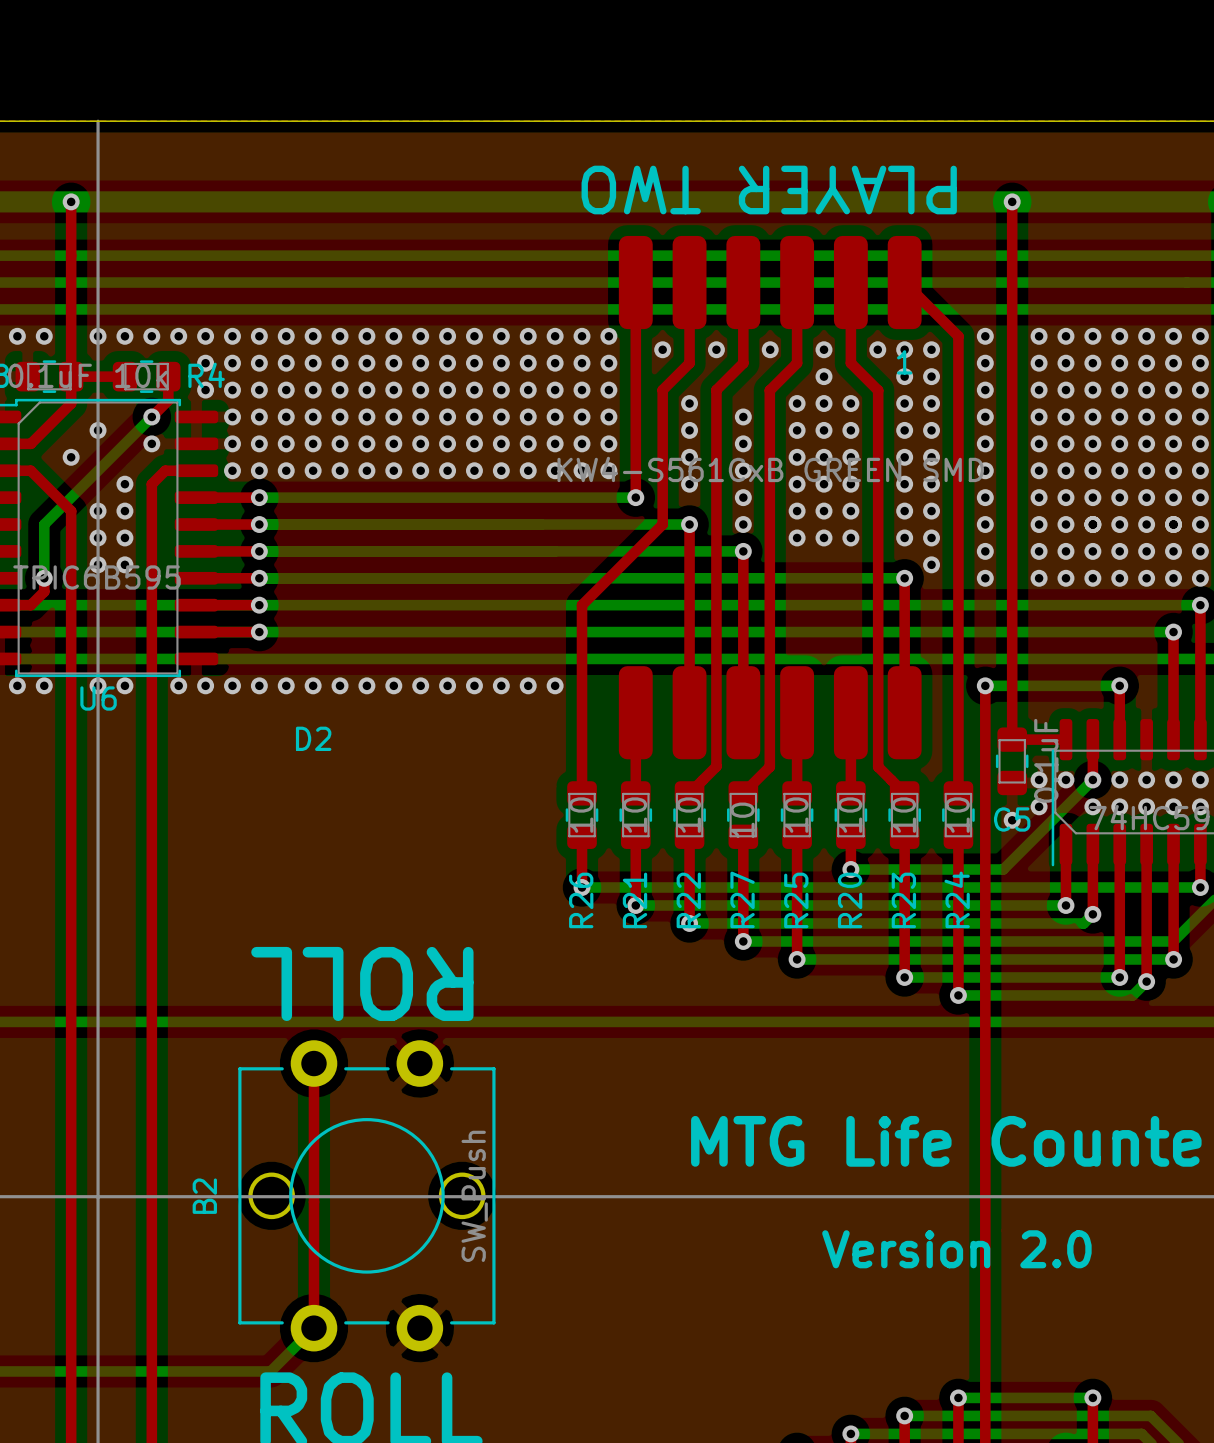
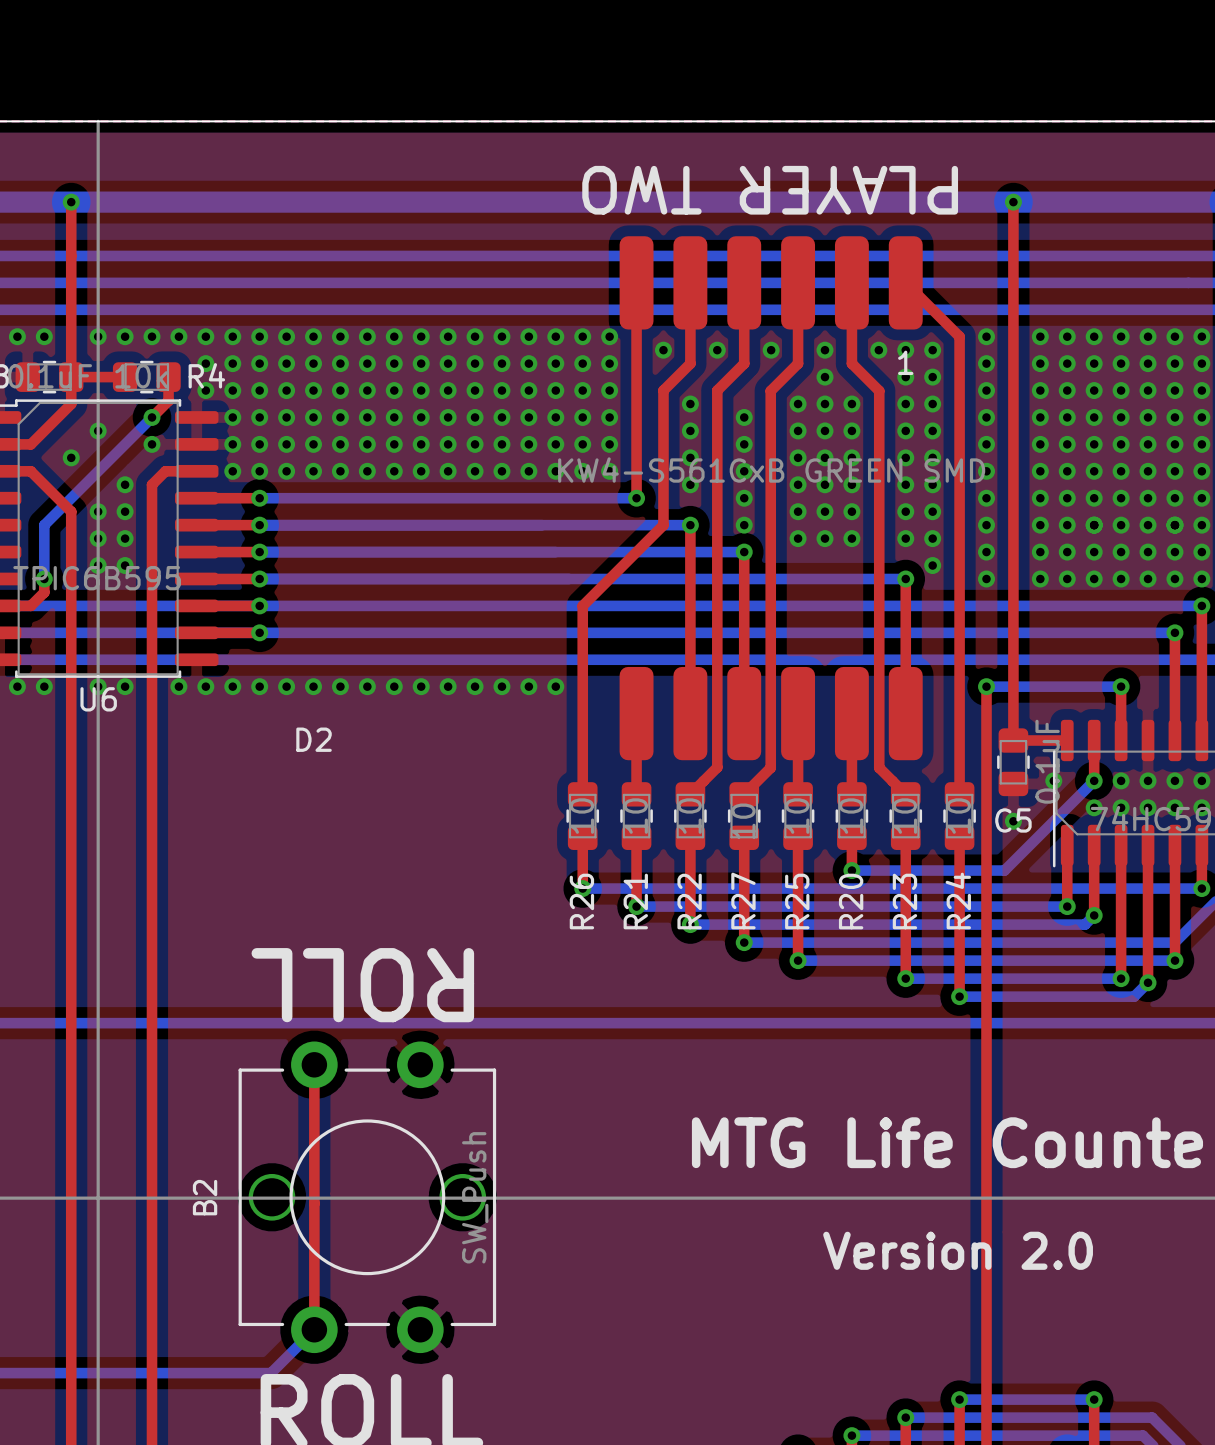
via: (1039, 779) -> none
via: none -> (1053, 780)
via: (1065, 779) -> none
via: (1039, 806) -> none

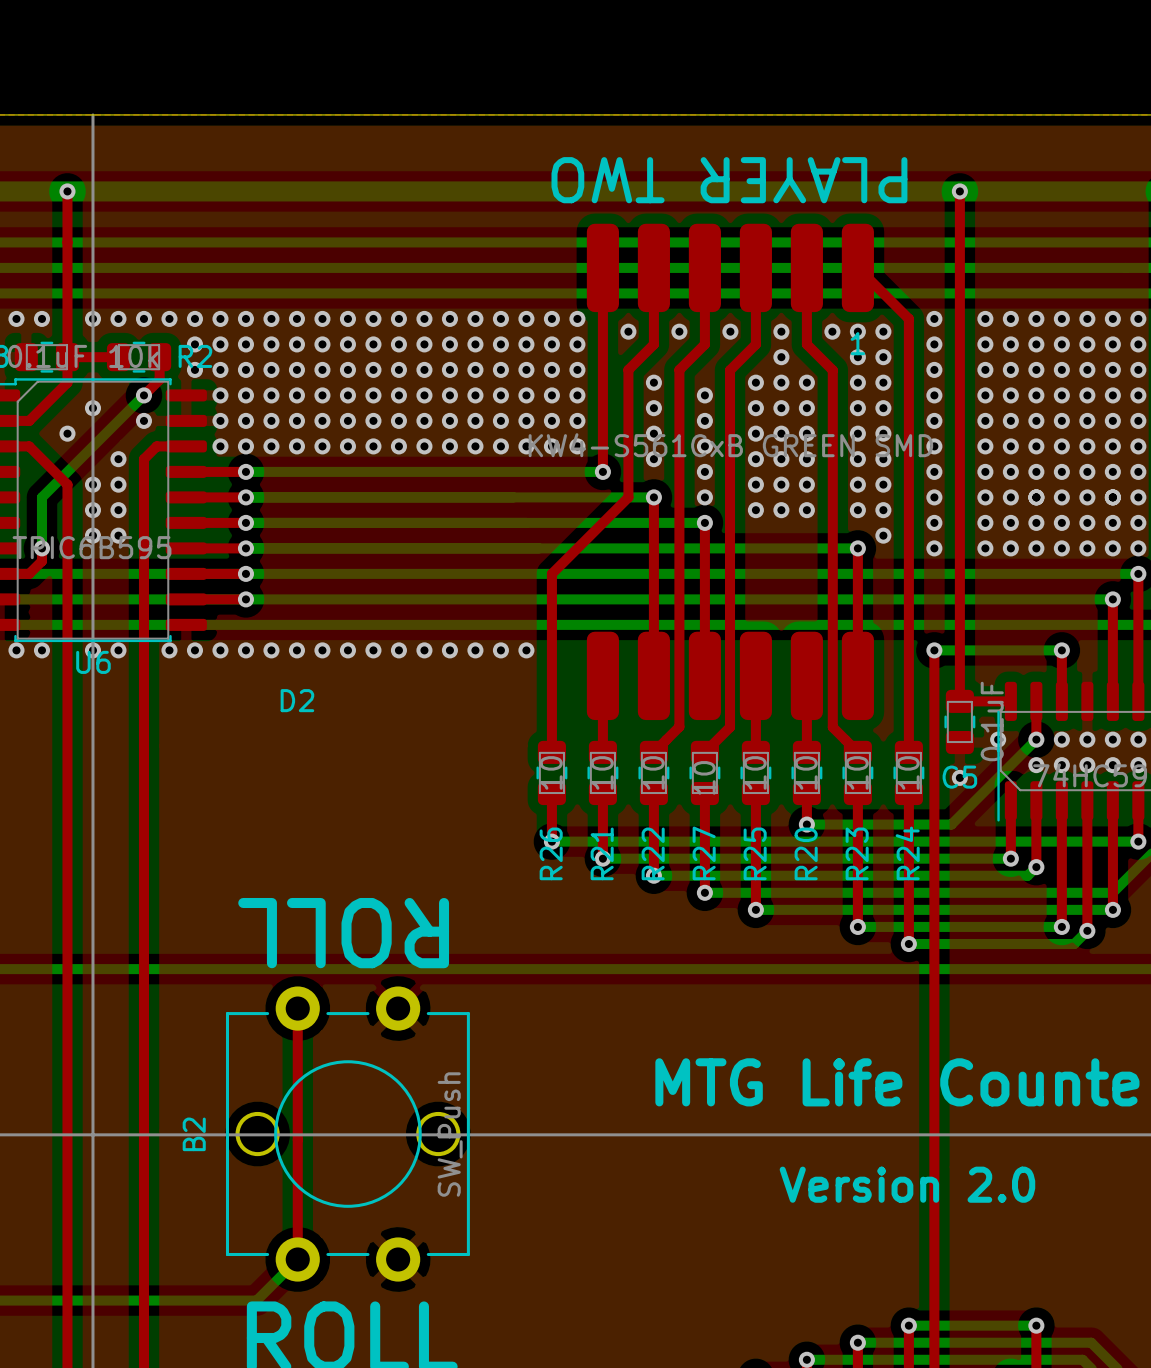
R4 name: R4 (206, 375) -> R2 (195, 356)

